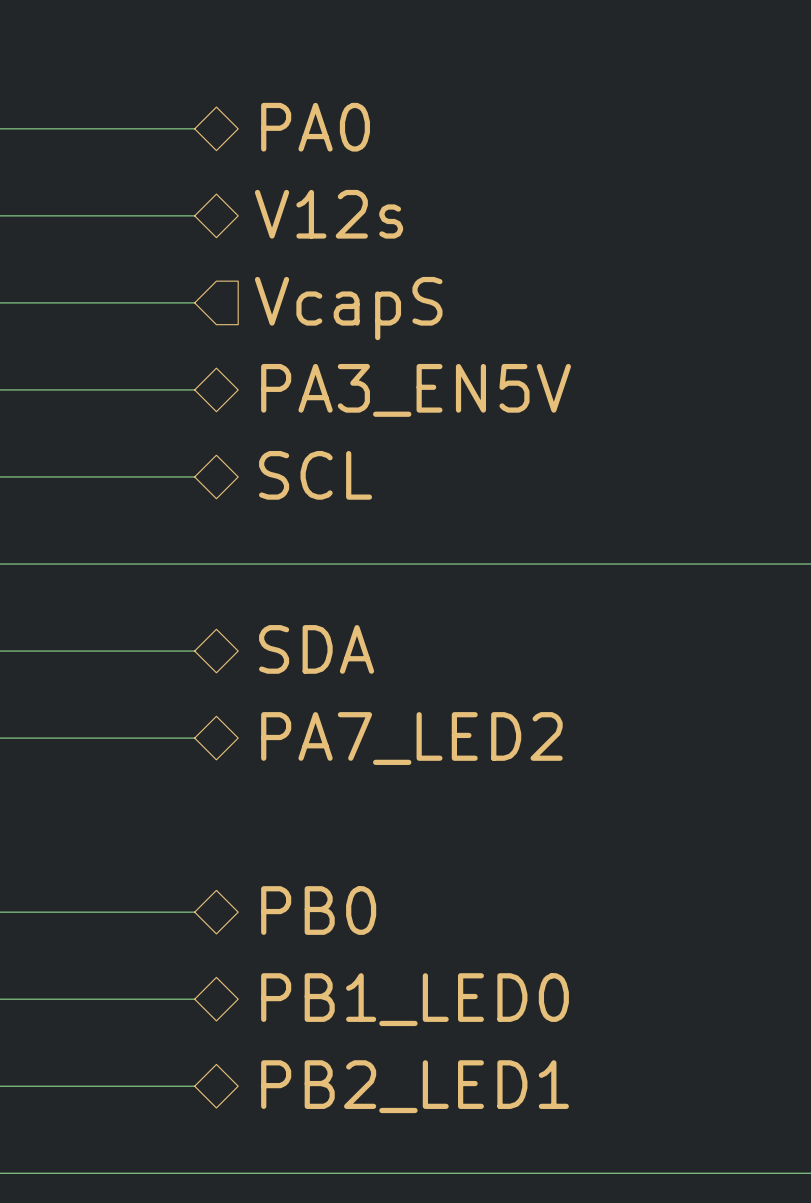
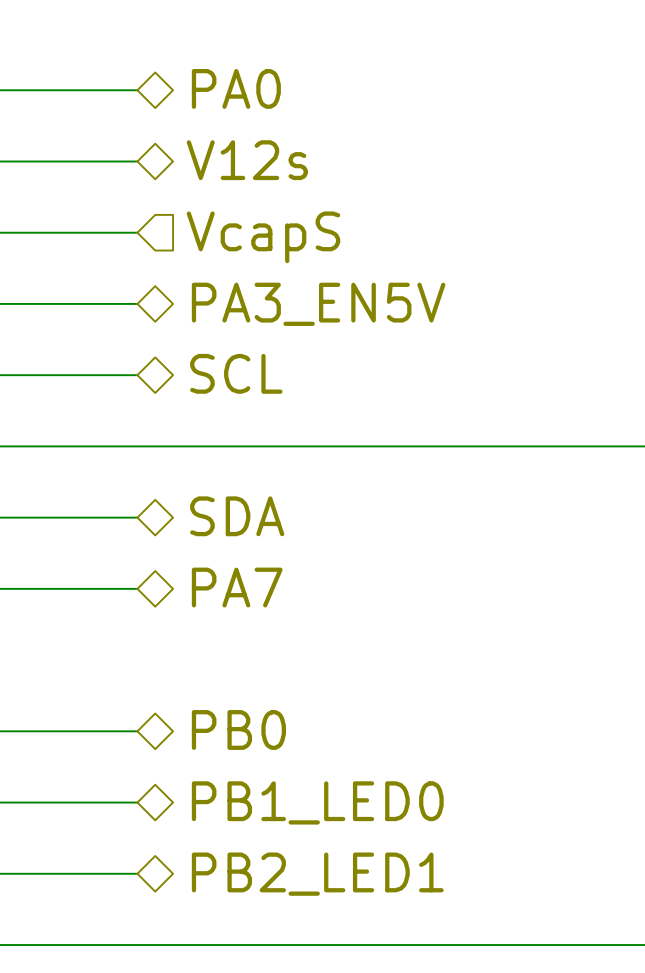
hierarchical label: PA7_LED2 (411, 738) -> PA7 (237, 587)

